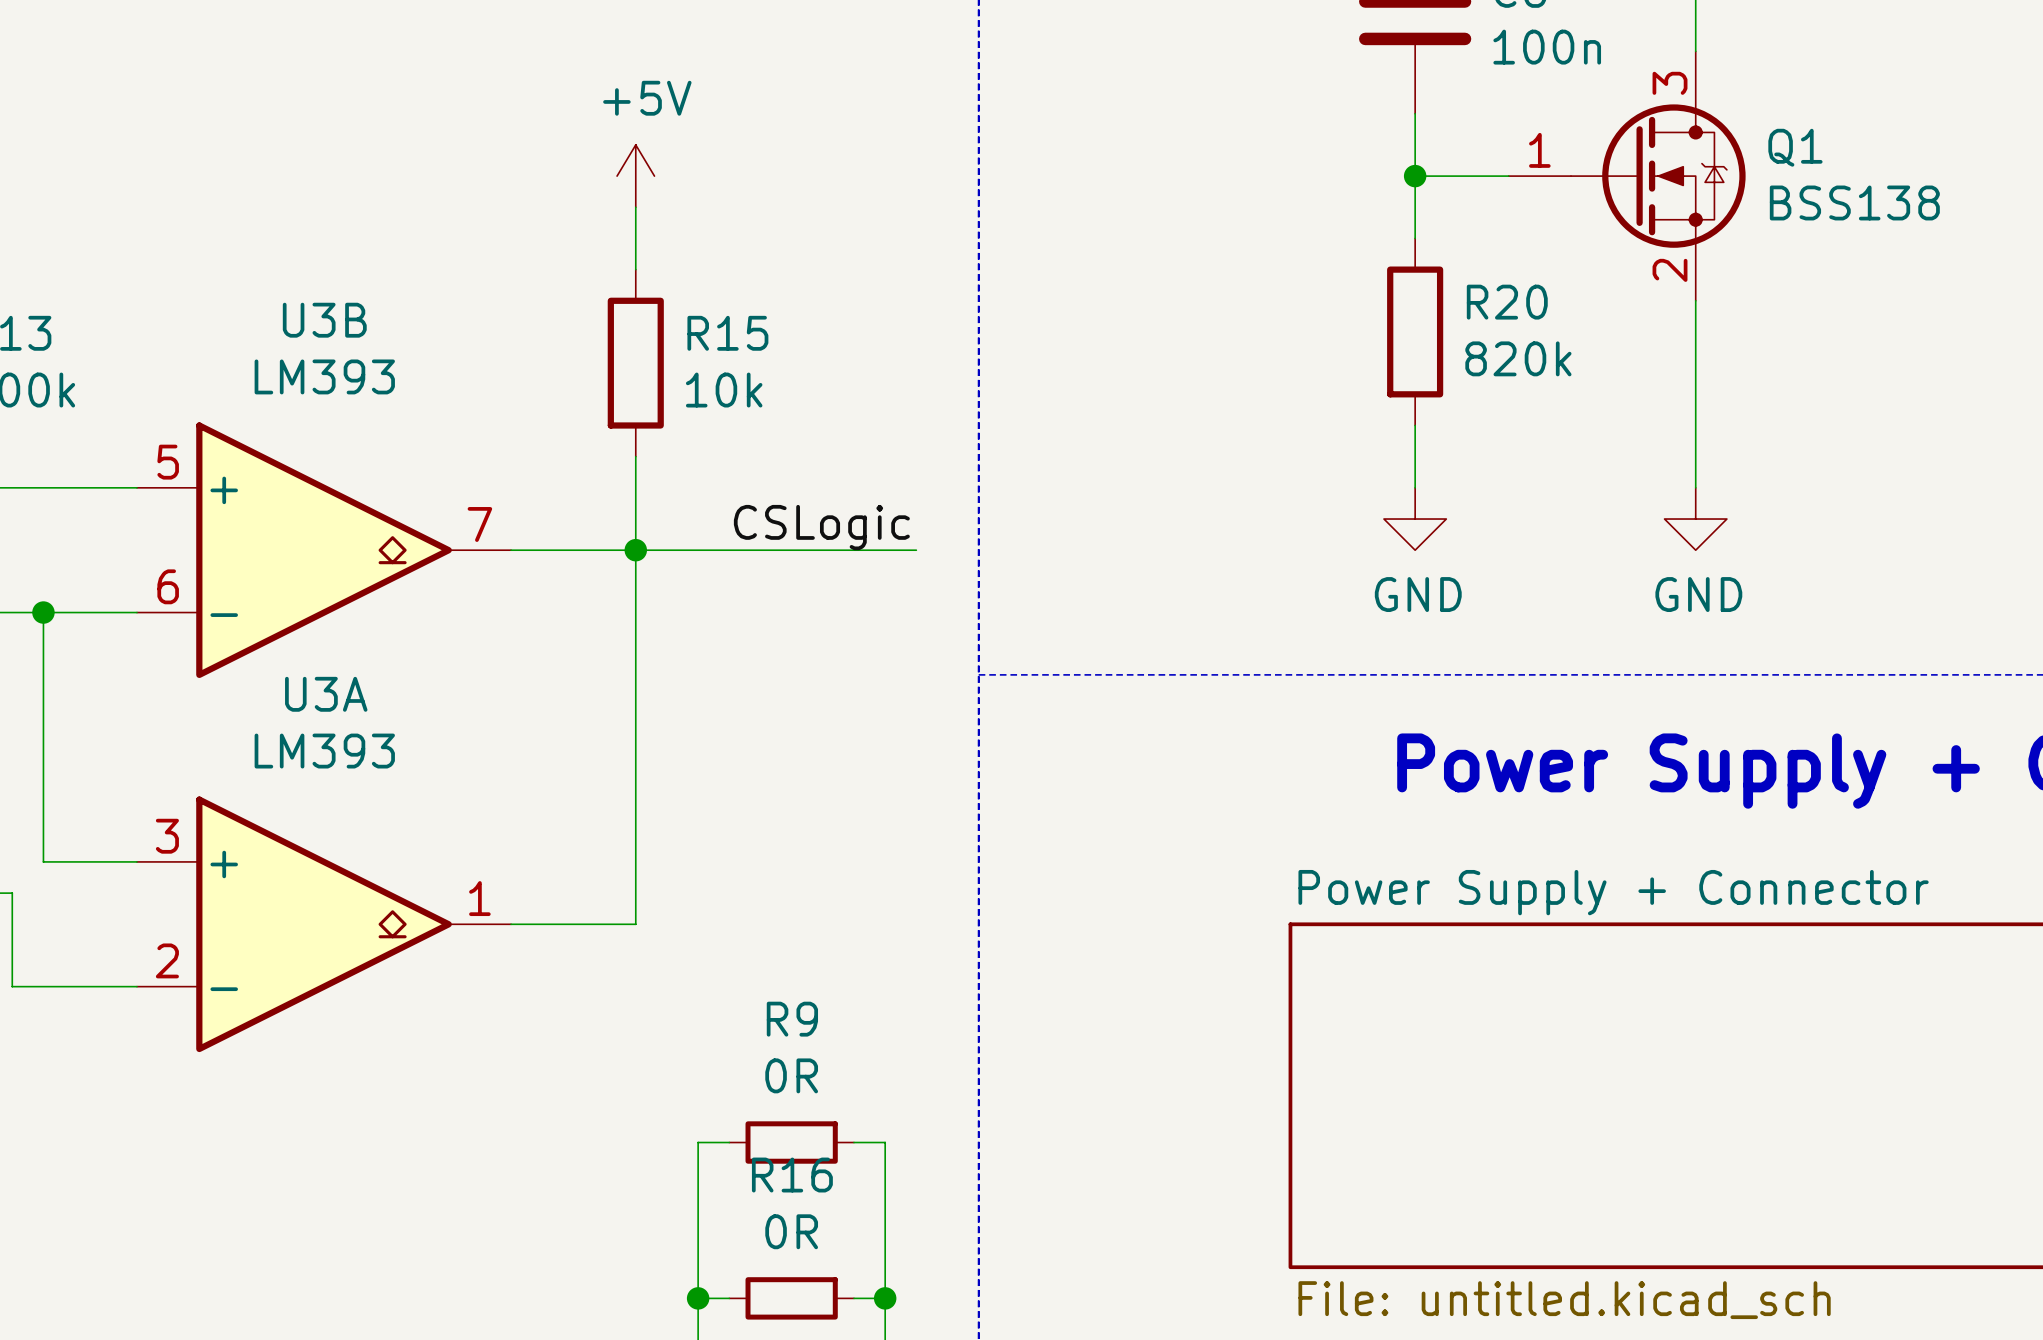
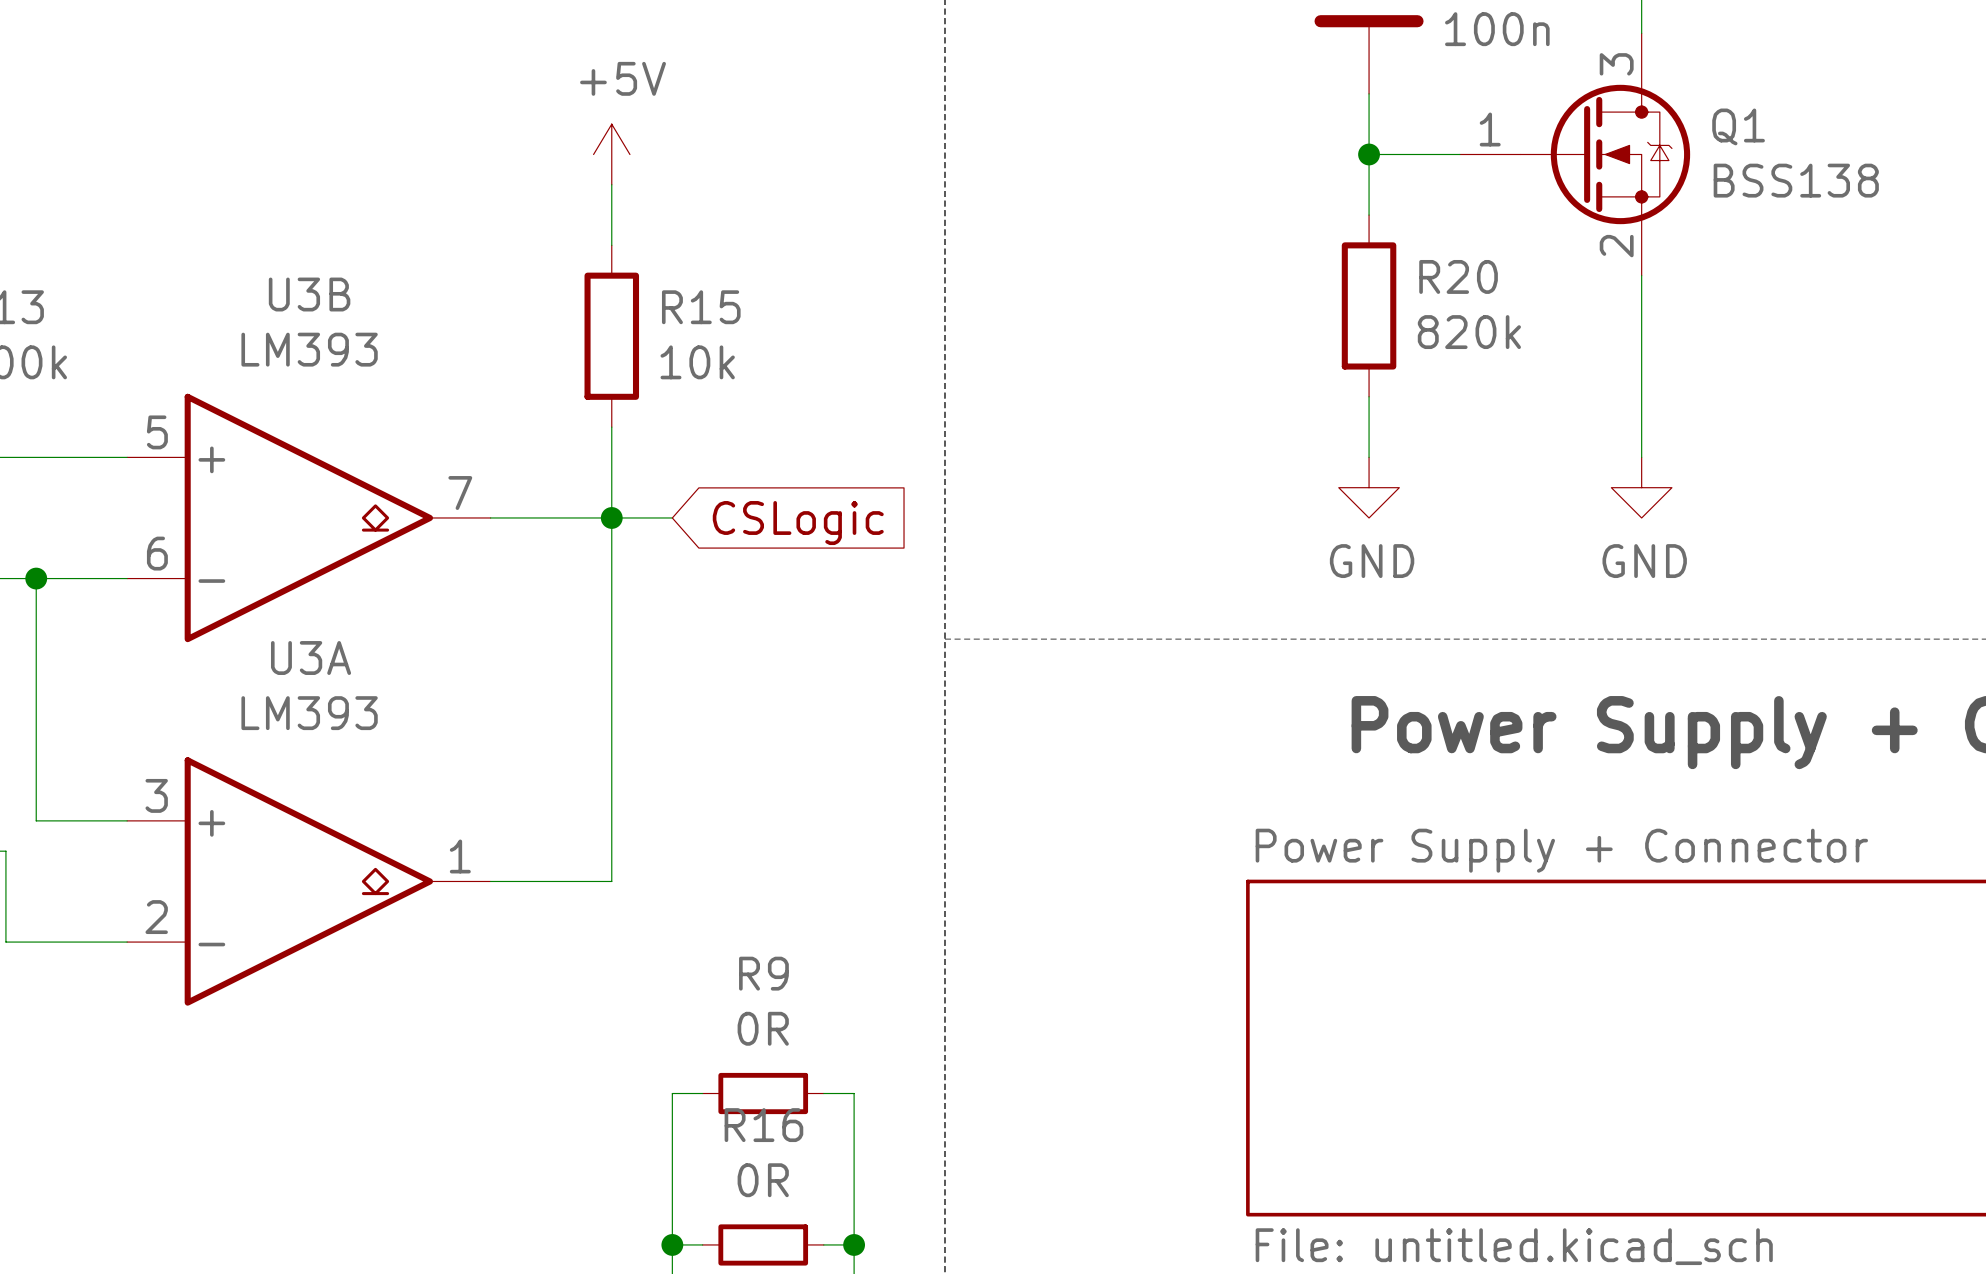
label: CSLogic (821, 527) -> none
wire: (698, 550) (916, 550) -> none
global label: none -> CSLogic (798, 523)

